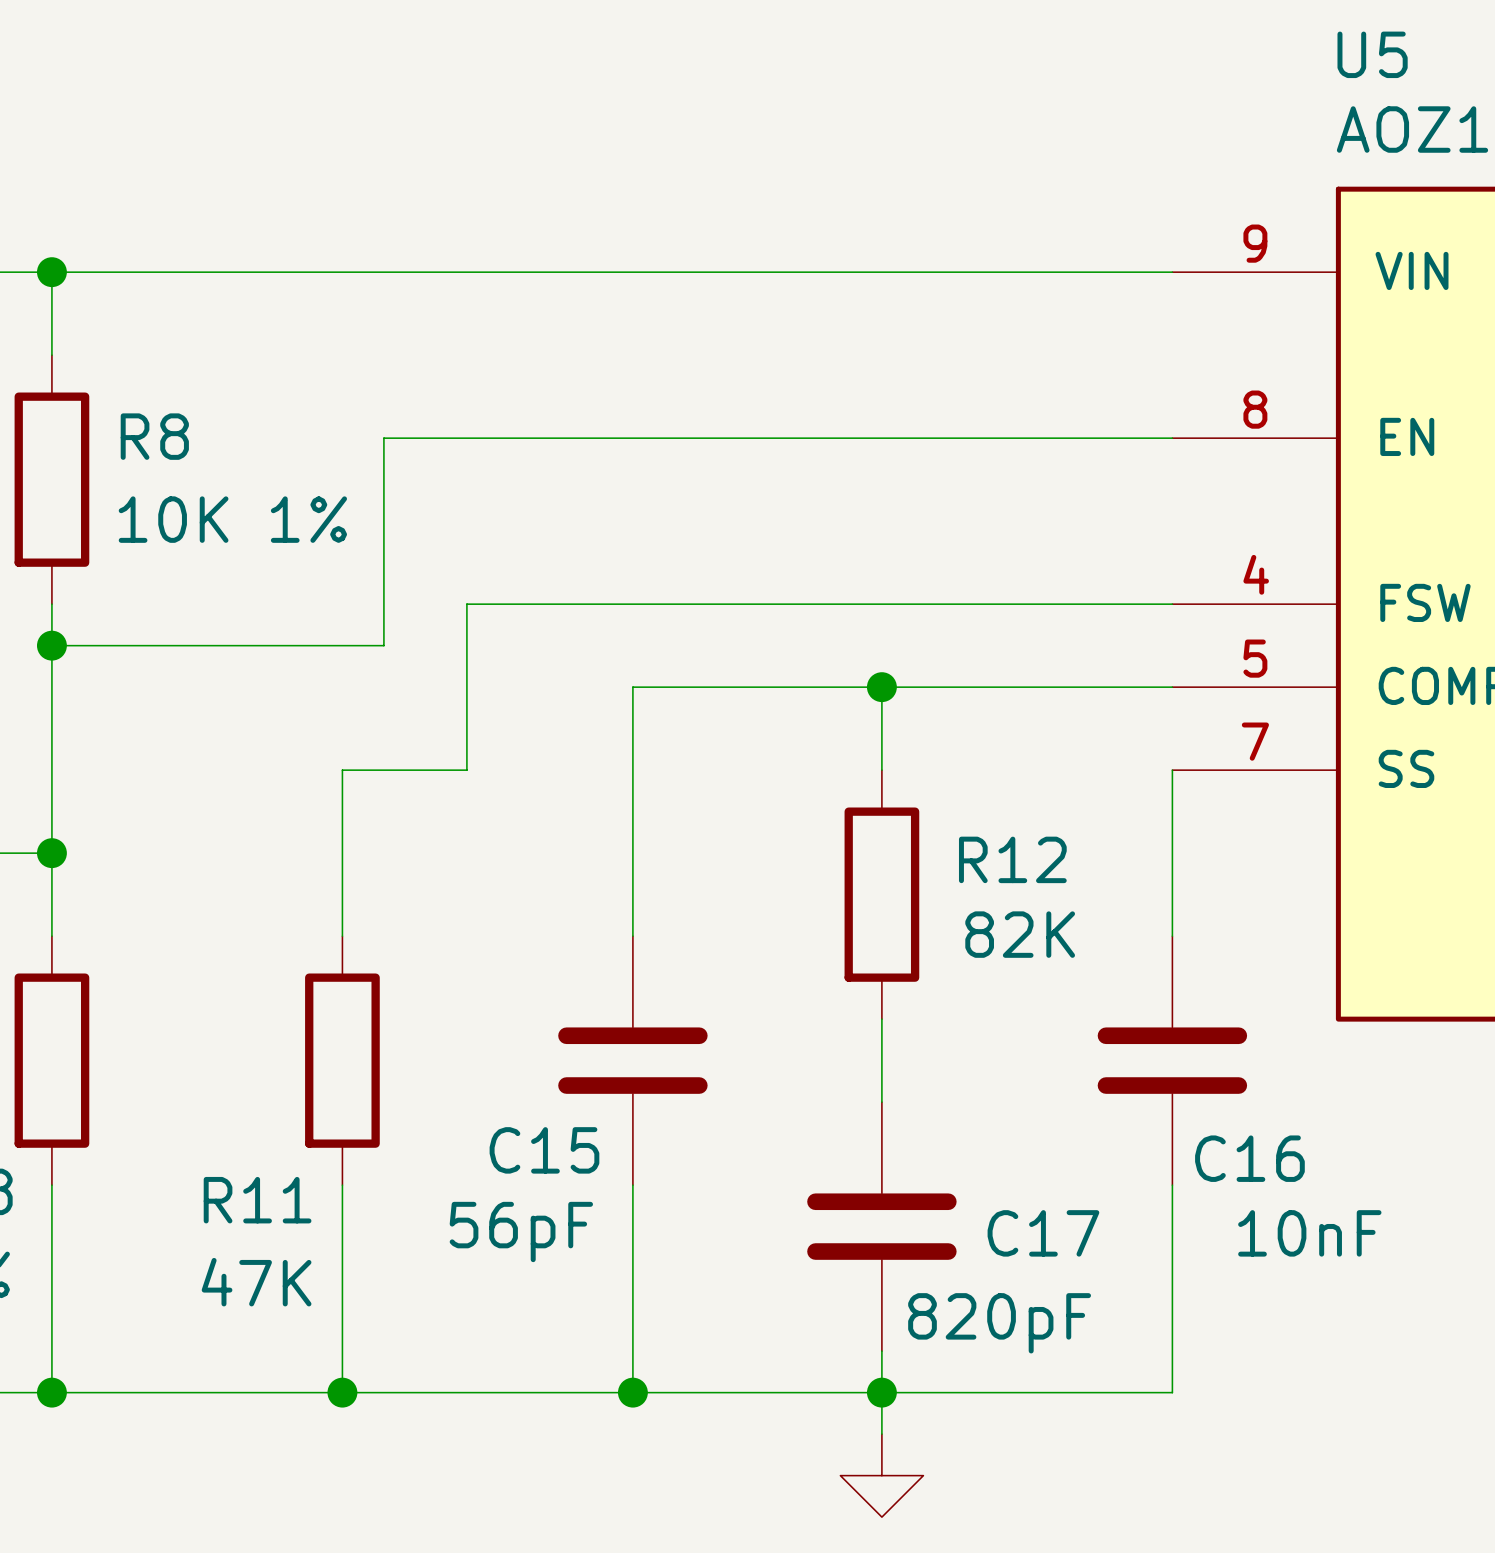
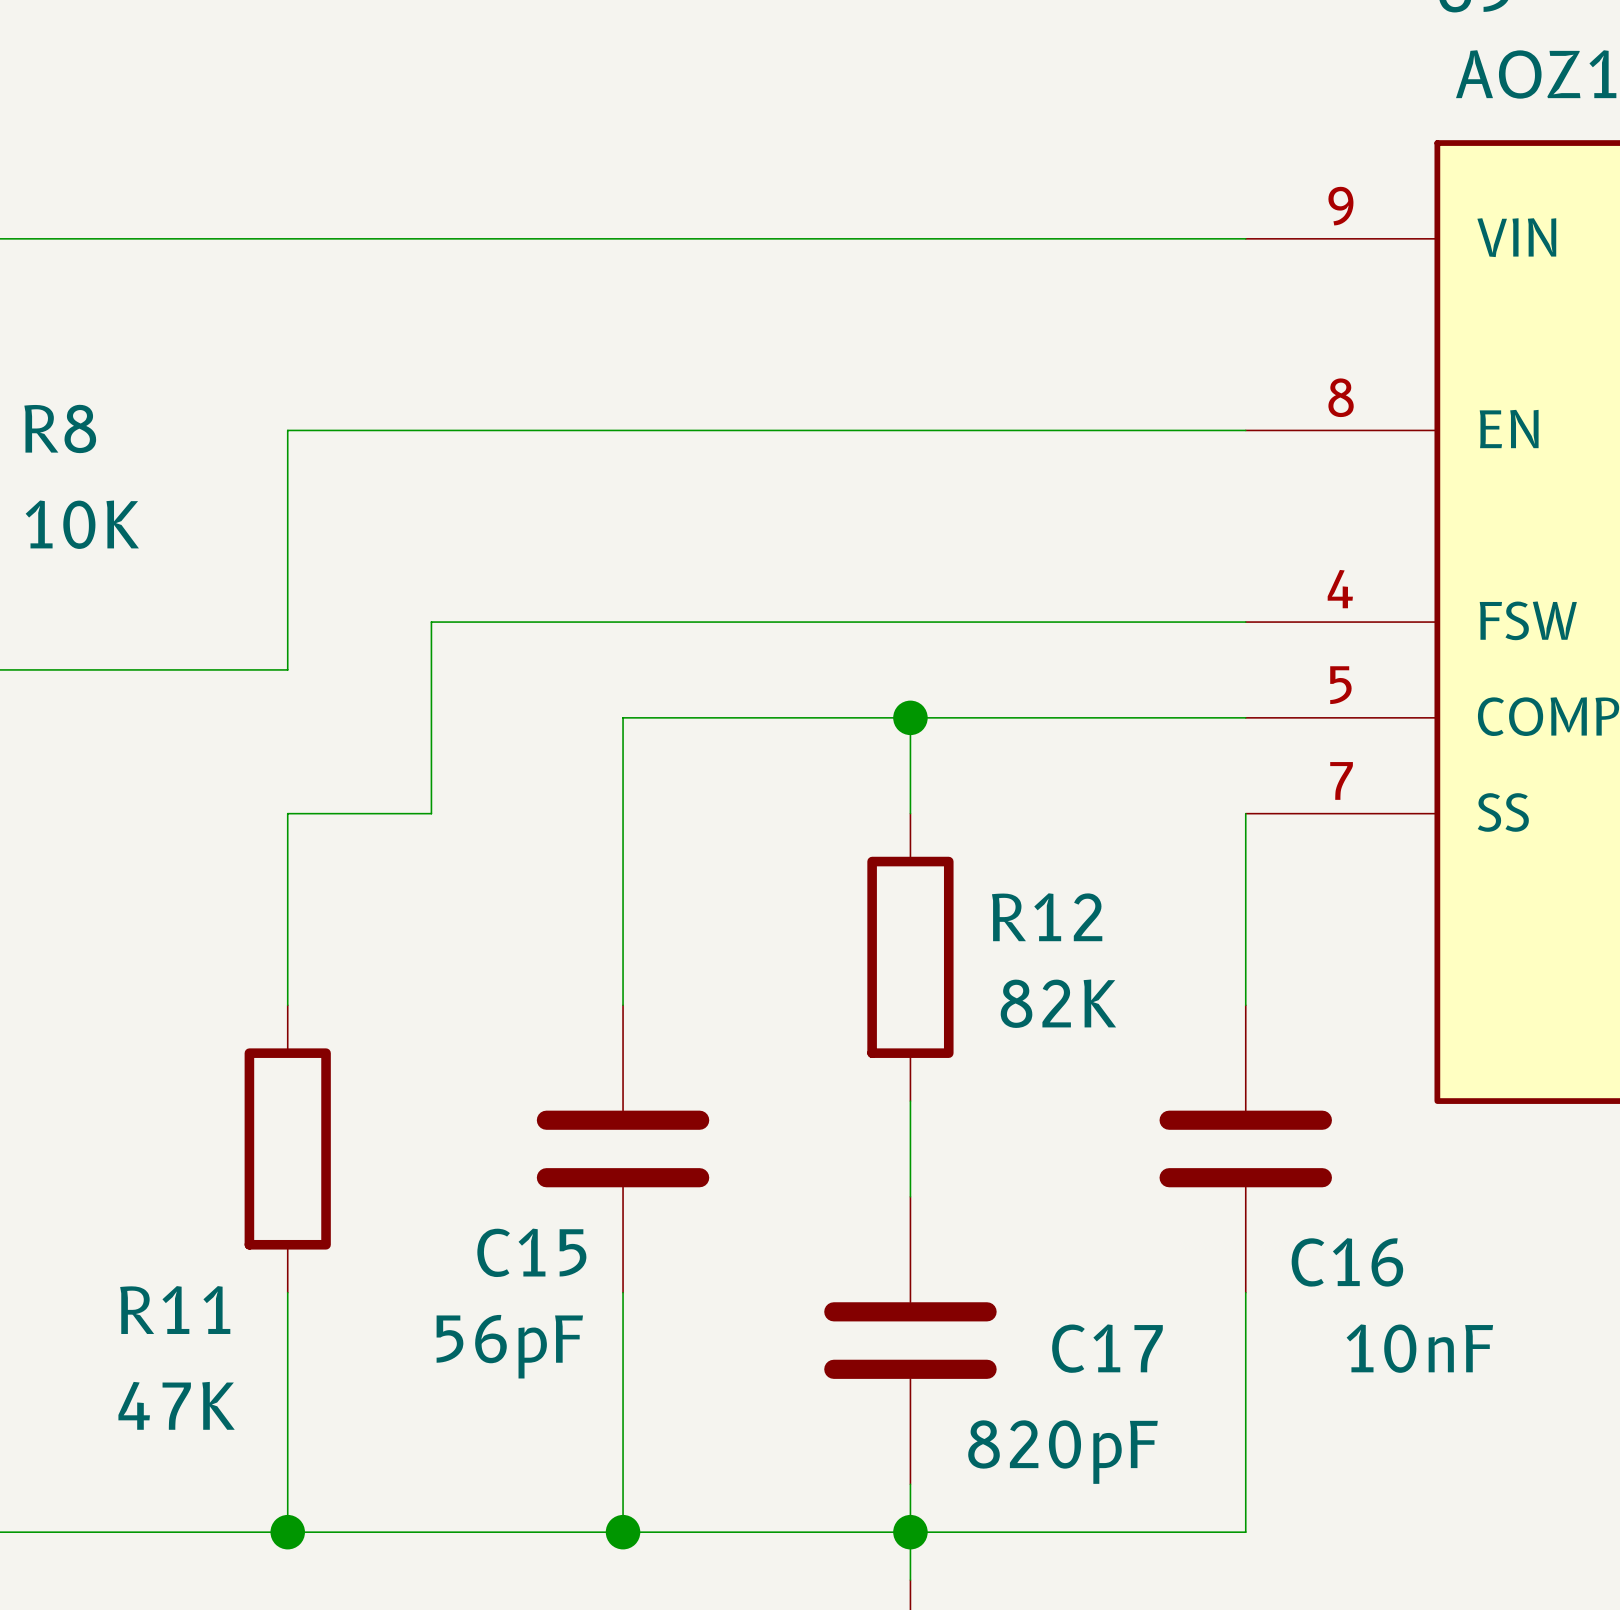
wire: (383, 438) (383, 645) (342, 645) -> (335, 430) (287, 430) (287, 669)
R8 value: 10K 1% (232, 519) -> 10K (82, 524)

